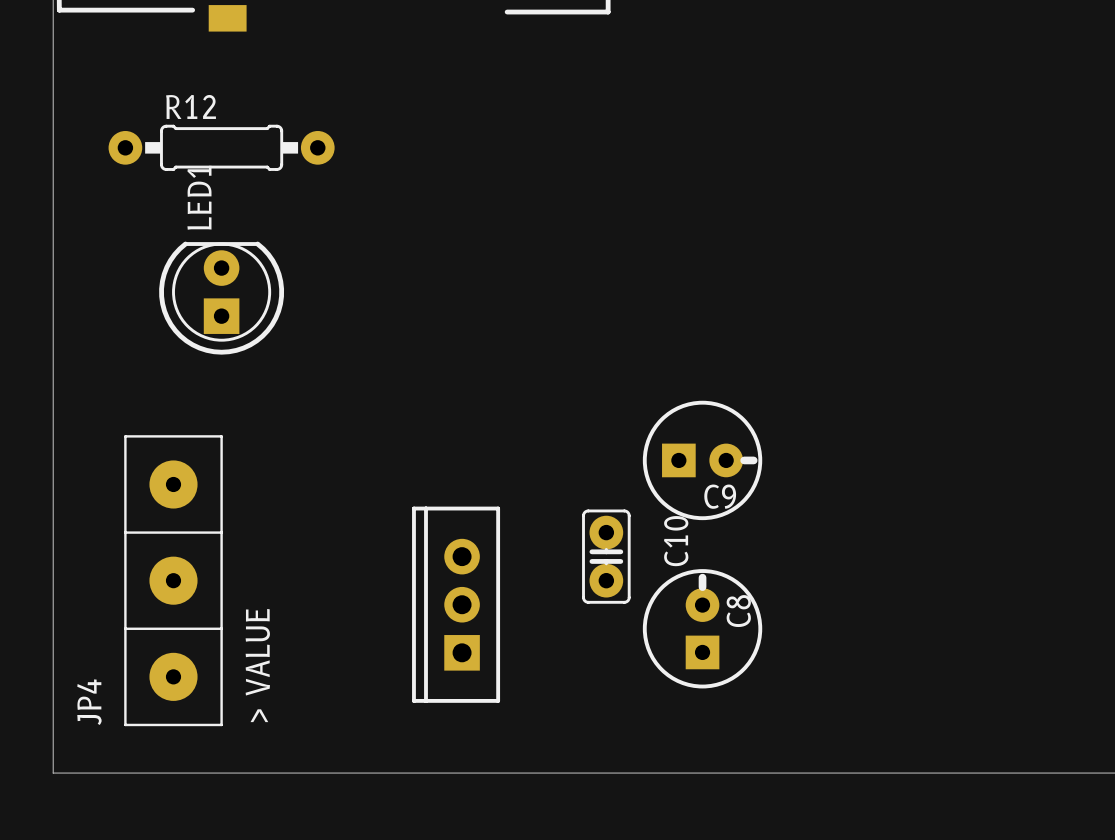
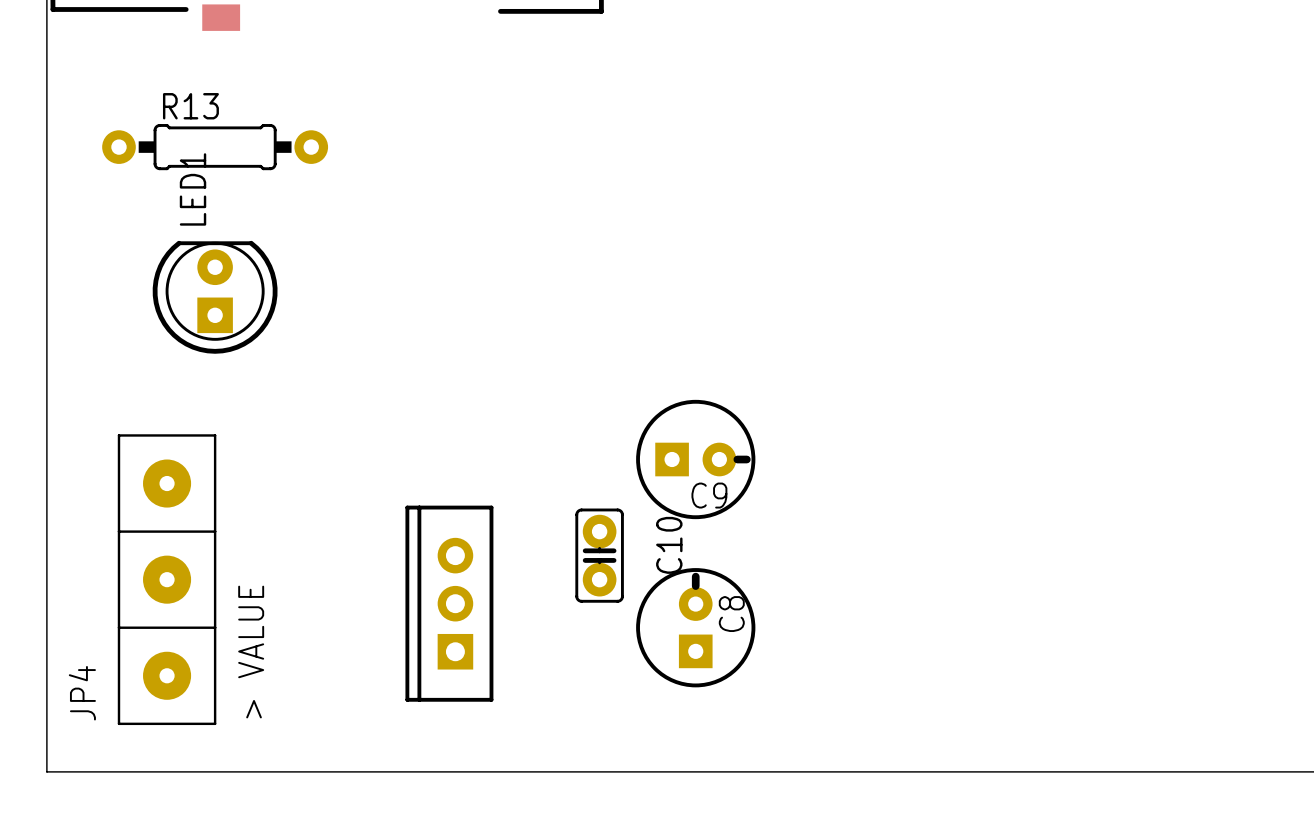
R12 name: R12 (191, 106) -> R13 (190, 106)

